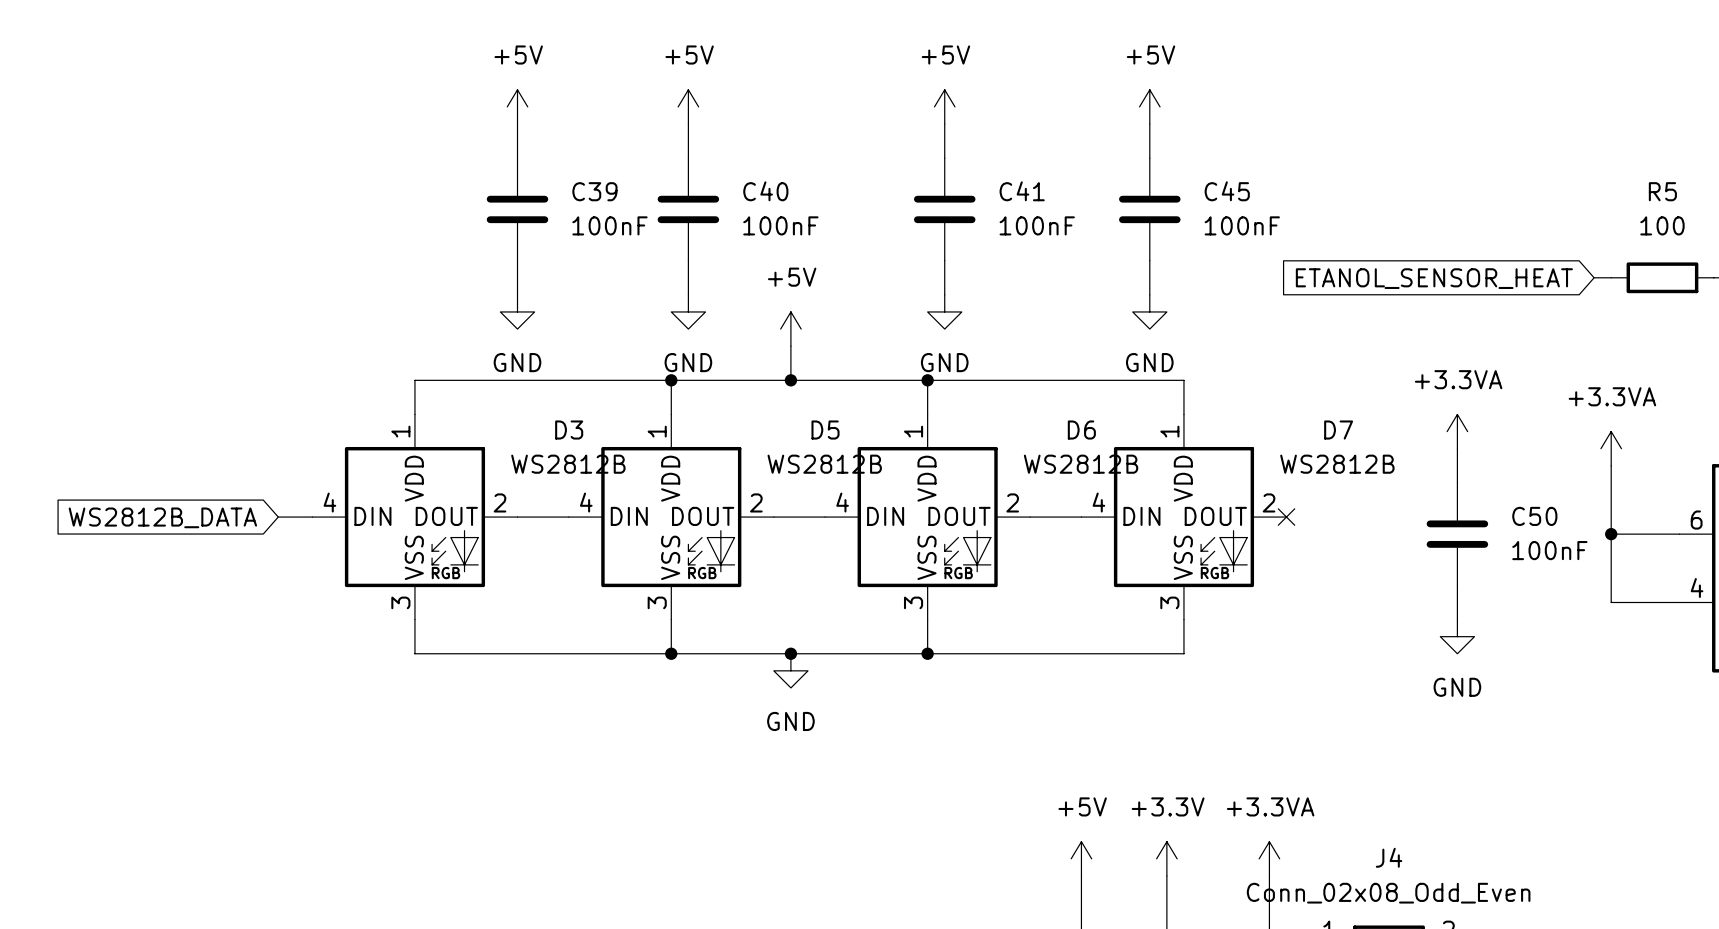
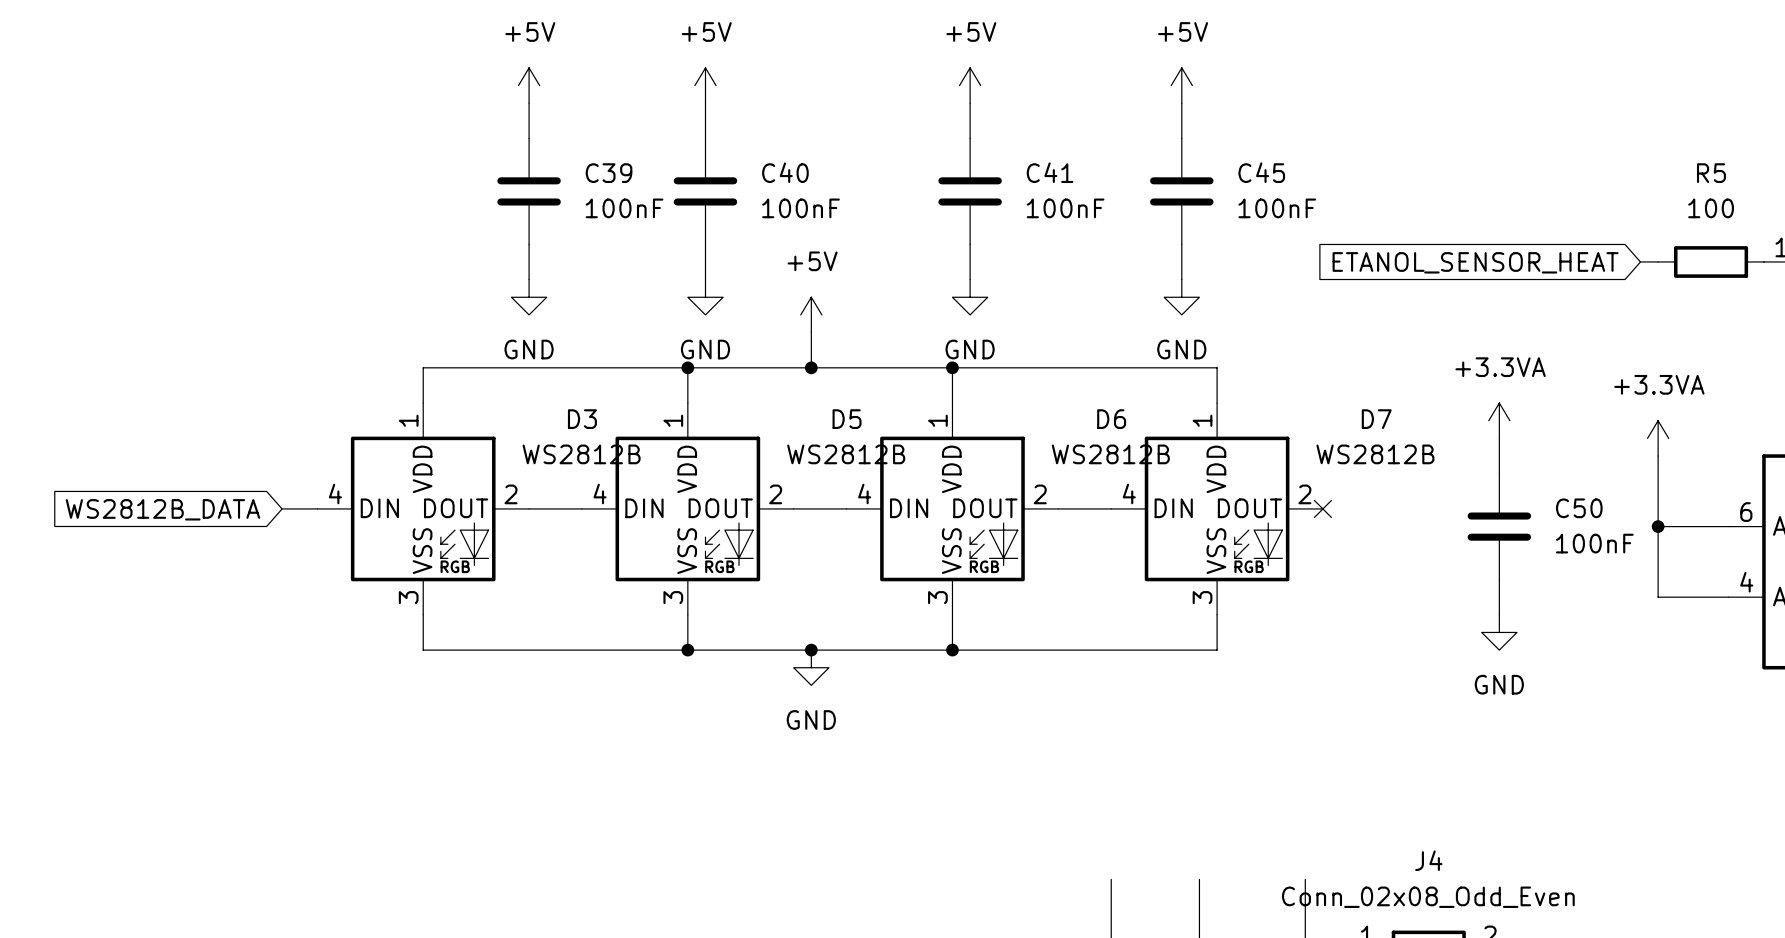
power symbol: +5V (1081, 858) -> none
power symbol: +3.3V (1166, 858) -> none
power symbol: +3.3VA (1269, 858) -> none

